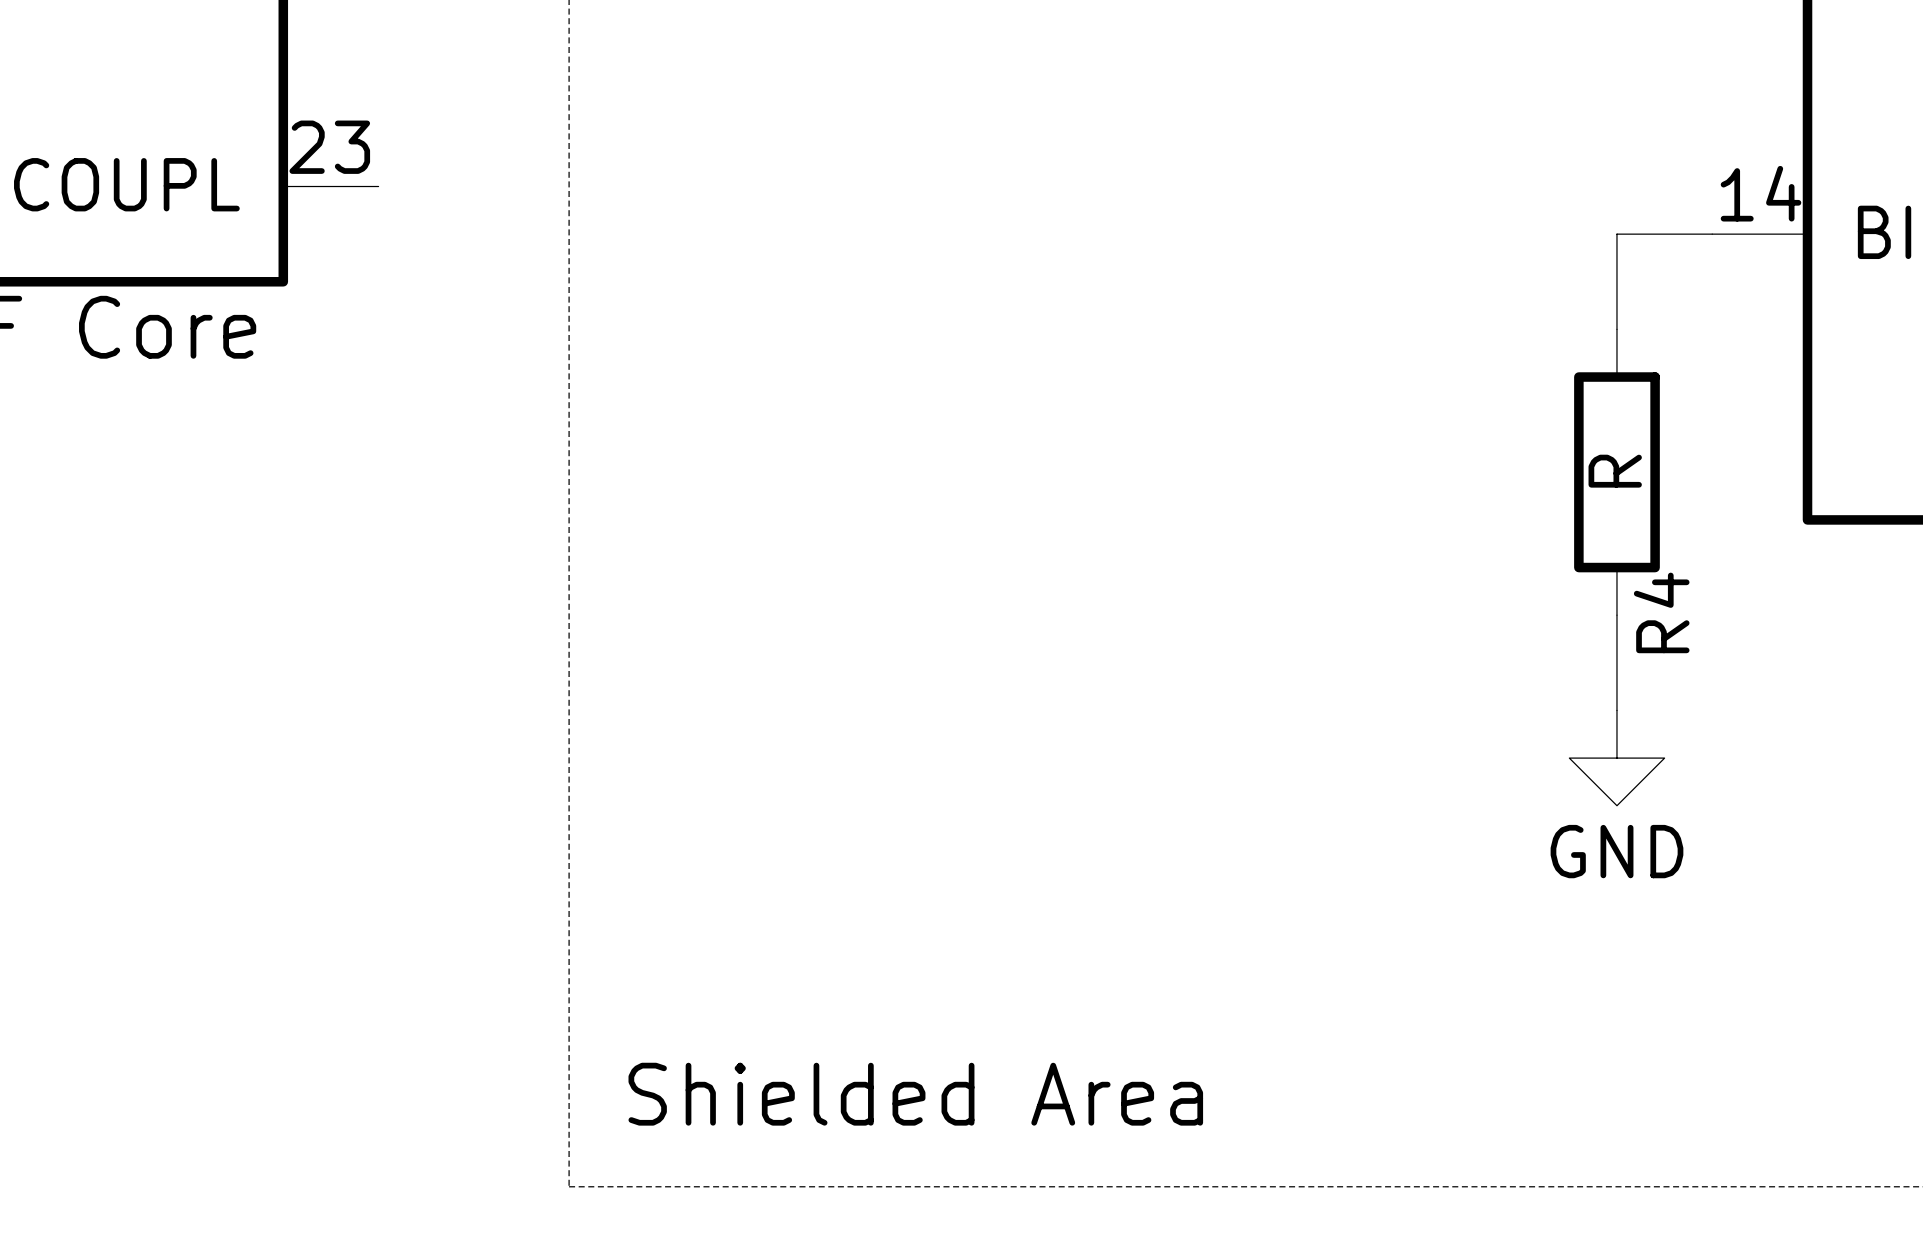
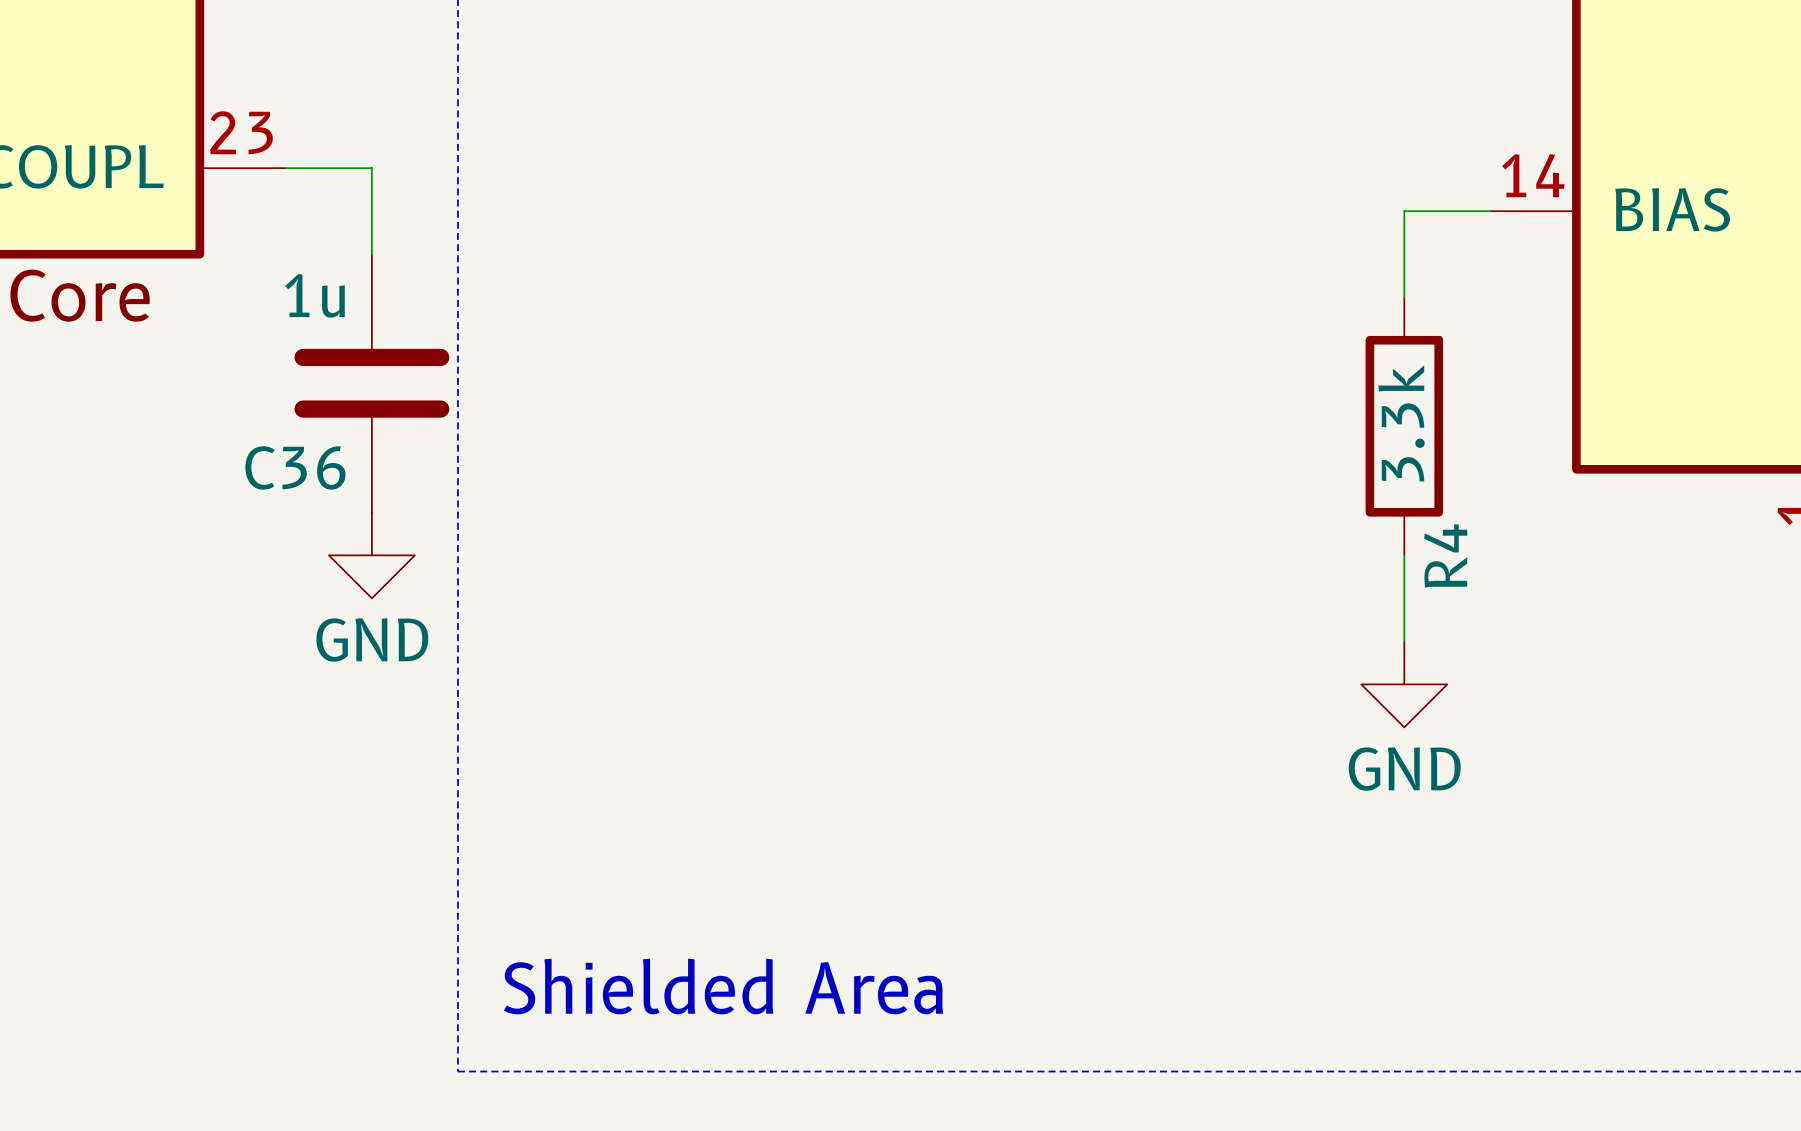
wire: none -> (285, 168) (371, 168) (371, 254)
C36: none -> 1u (371, 383)
R4 value: R (1615, 471) -> 3.3k (1401, 423)
power symbol: none -> GND (371, 555)

